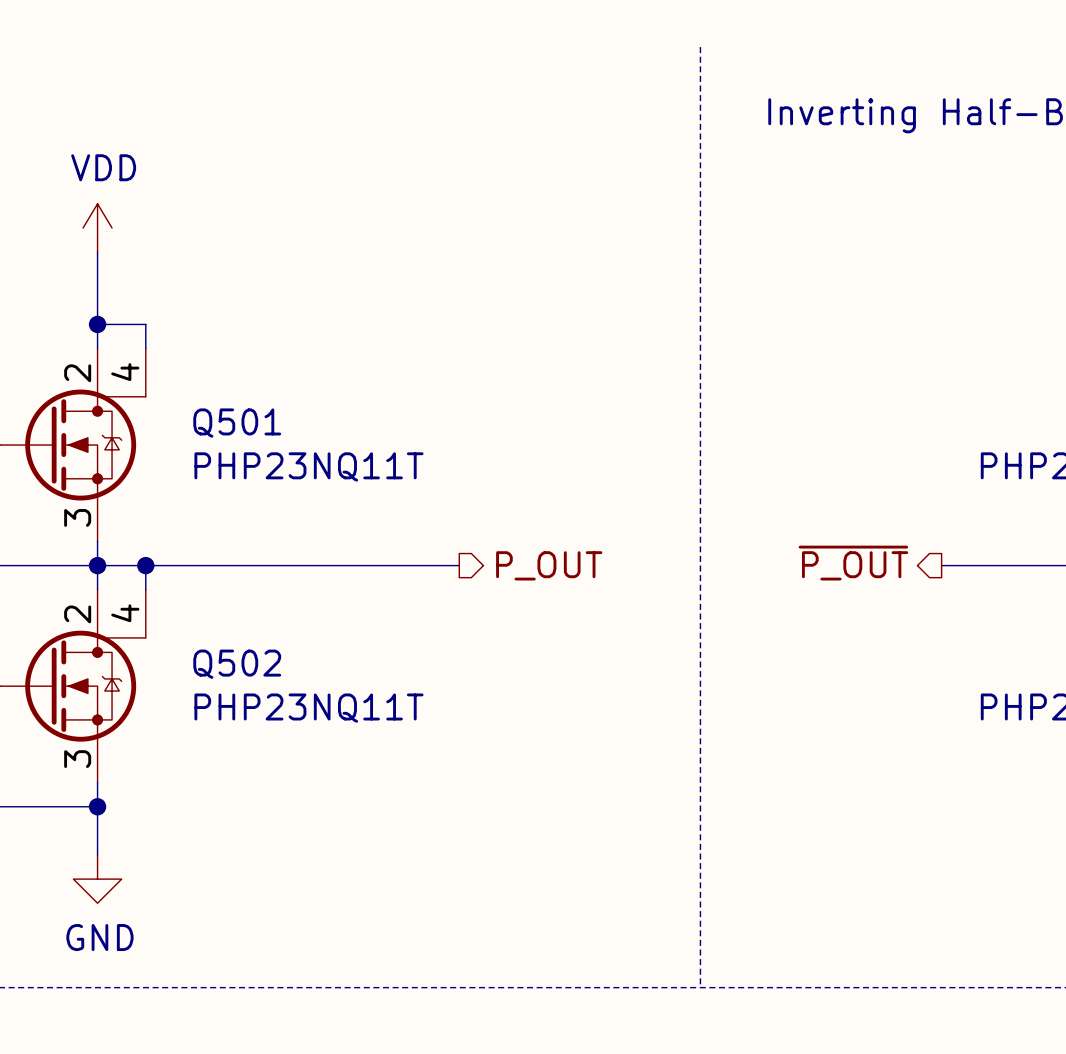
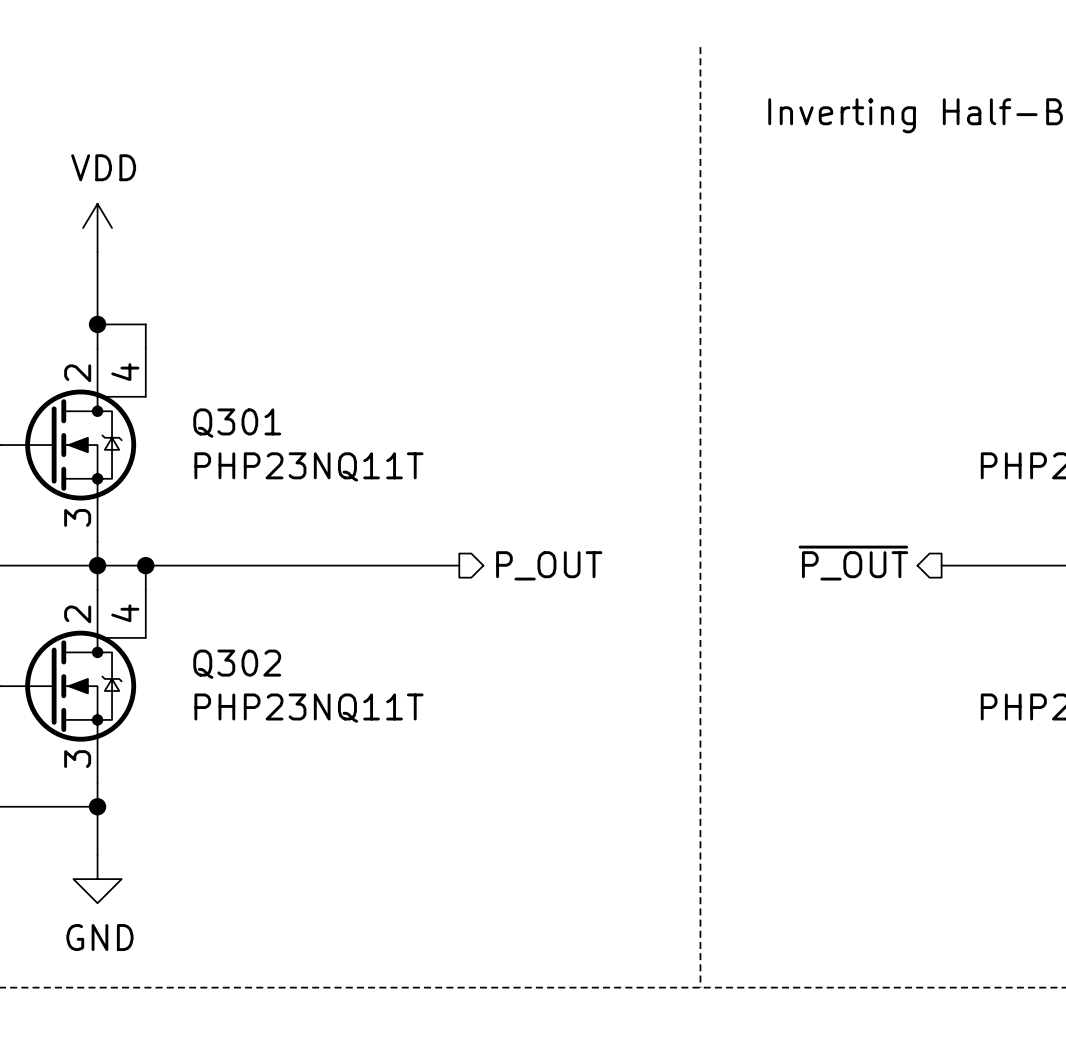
Q501 name: Q501 (237, 423) -> Q301 (237, 423)
Q502 name: Q502 (237, 664) -> Q302 (237, 664)

